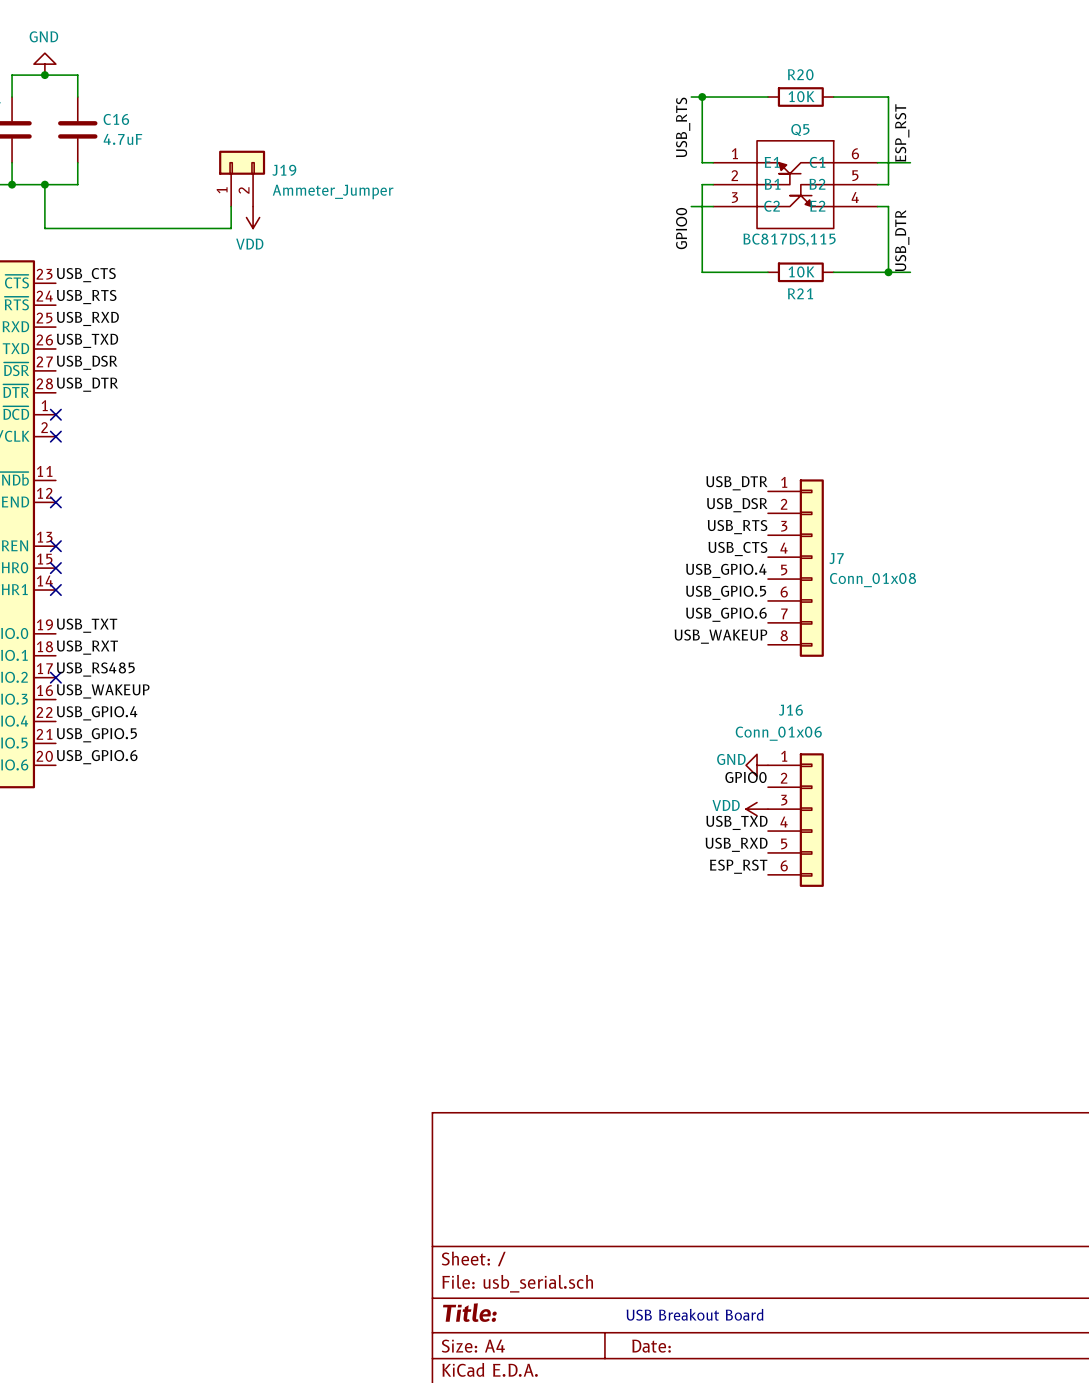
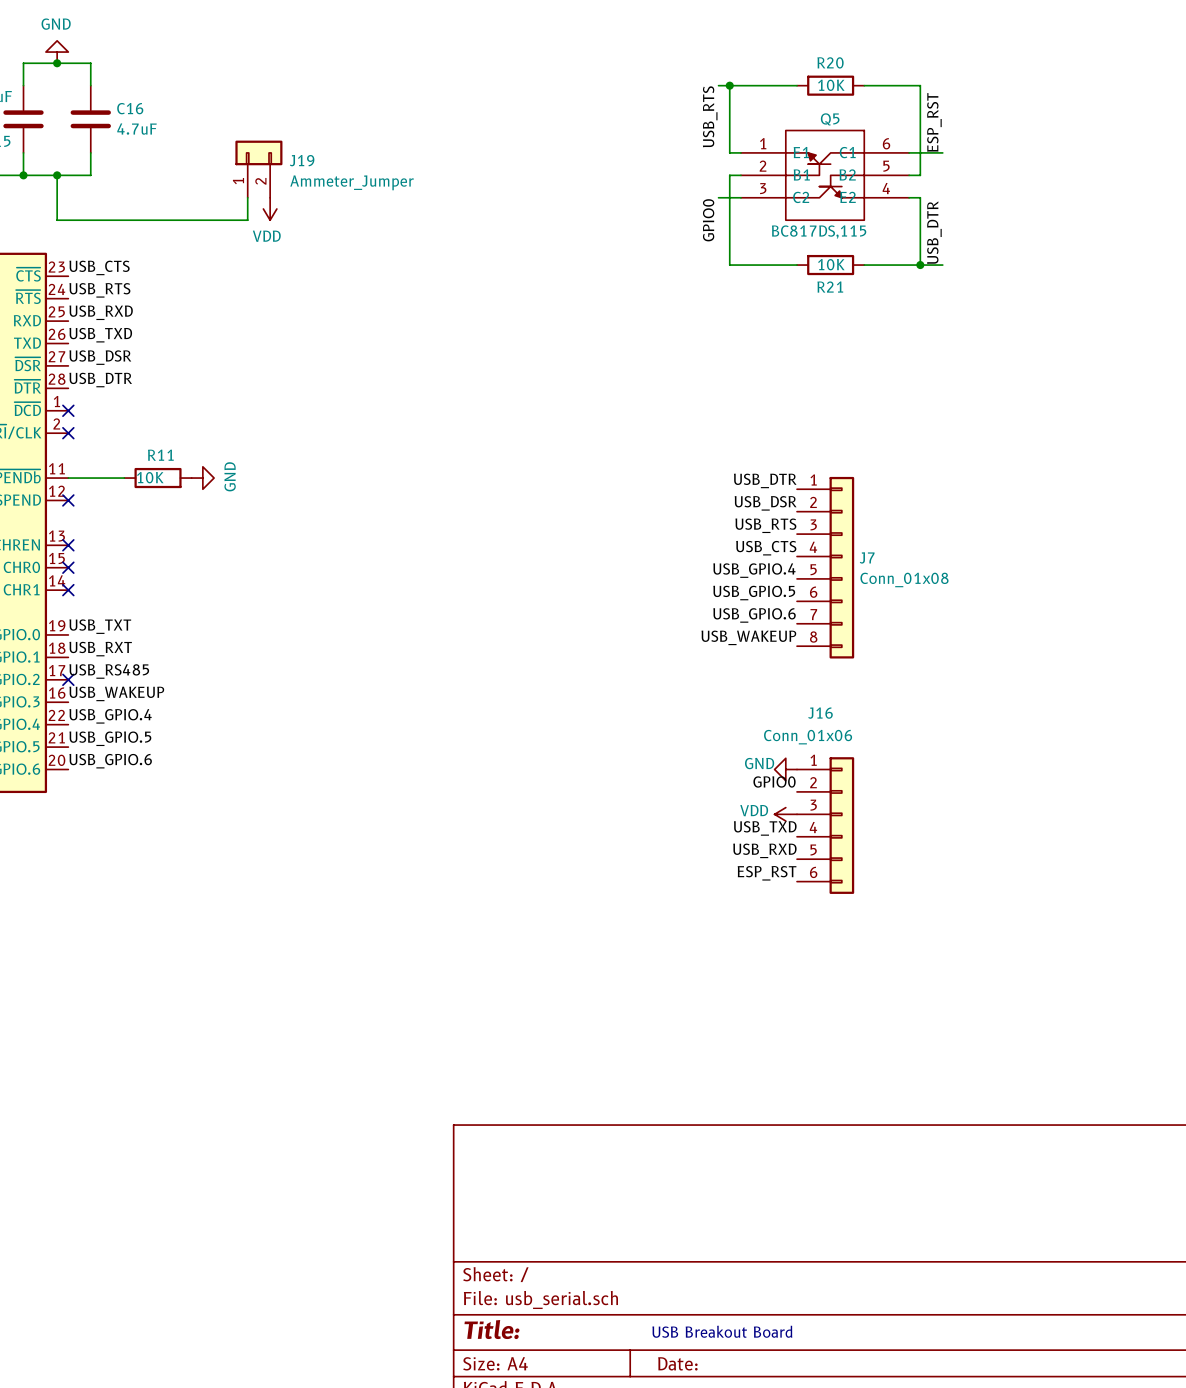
wire: none -> (68, 478) (124, 478)
R11: none -> 10K (158, 478)
power symbol: none -> GND (202, 478)

